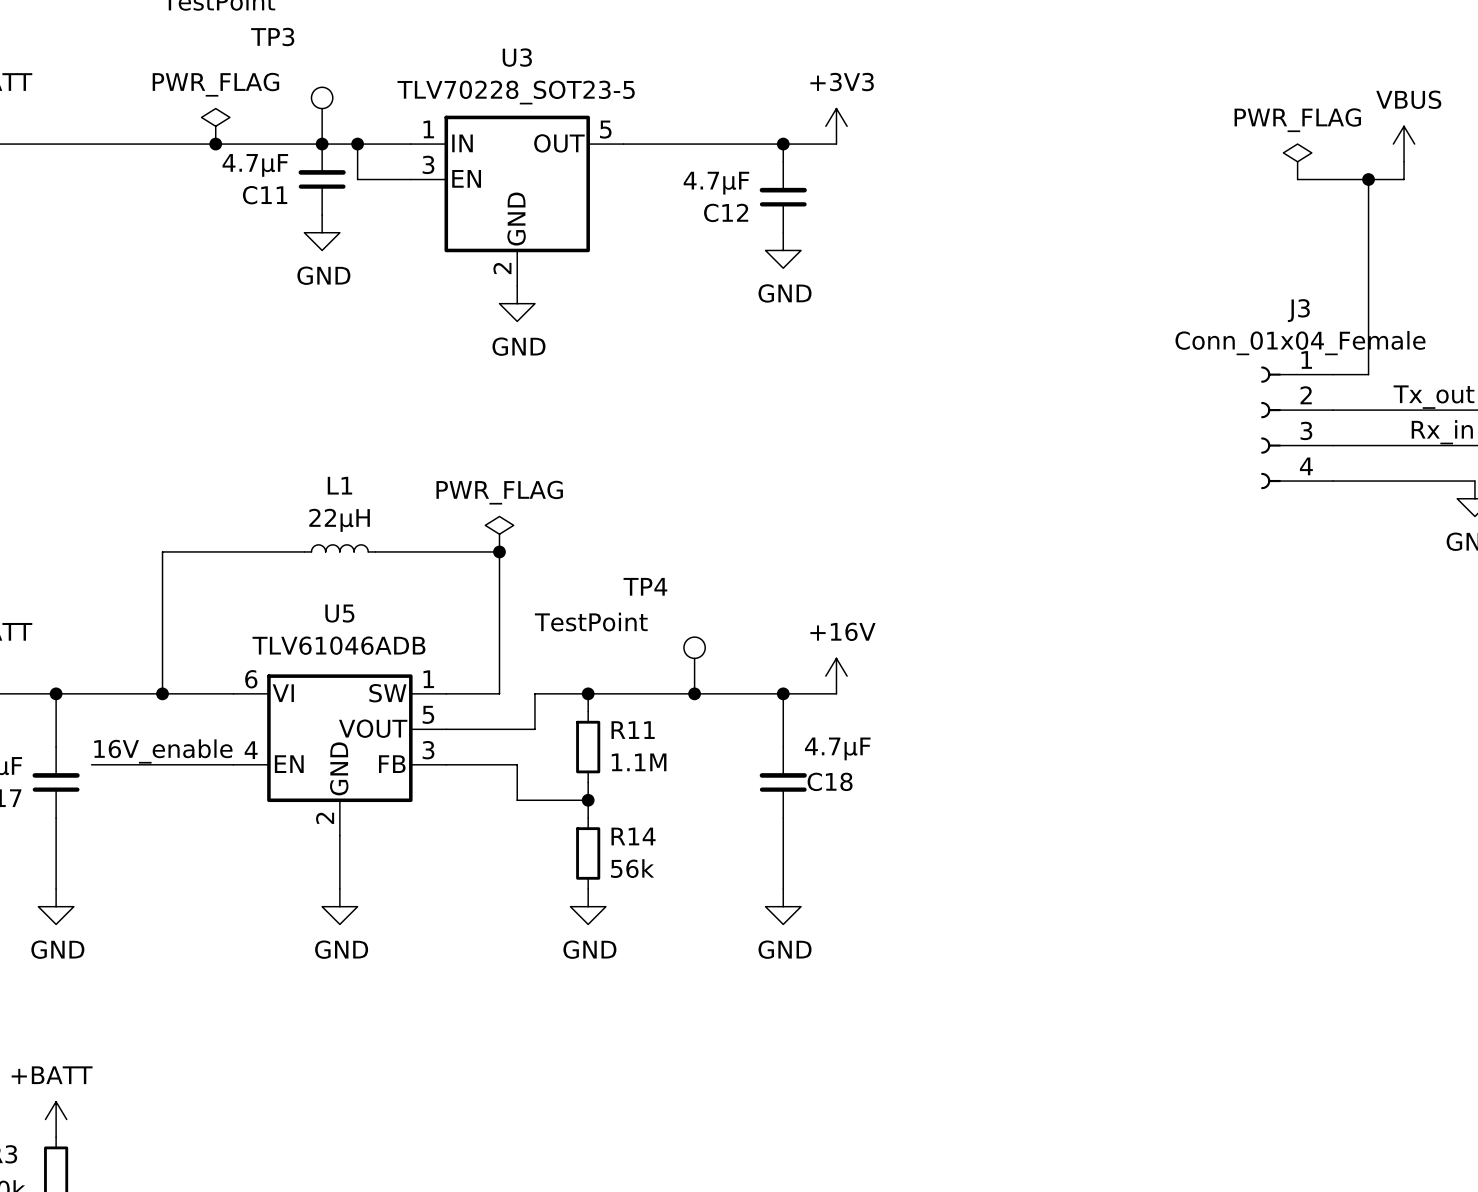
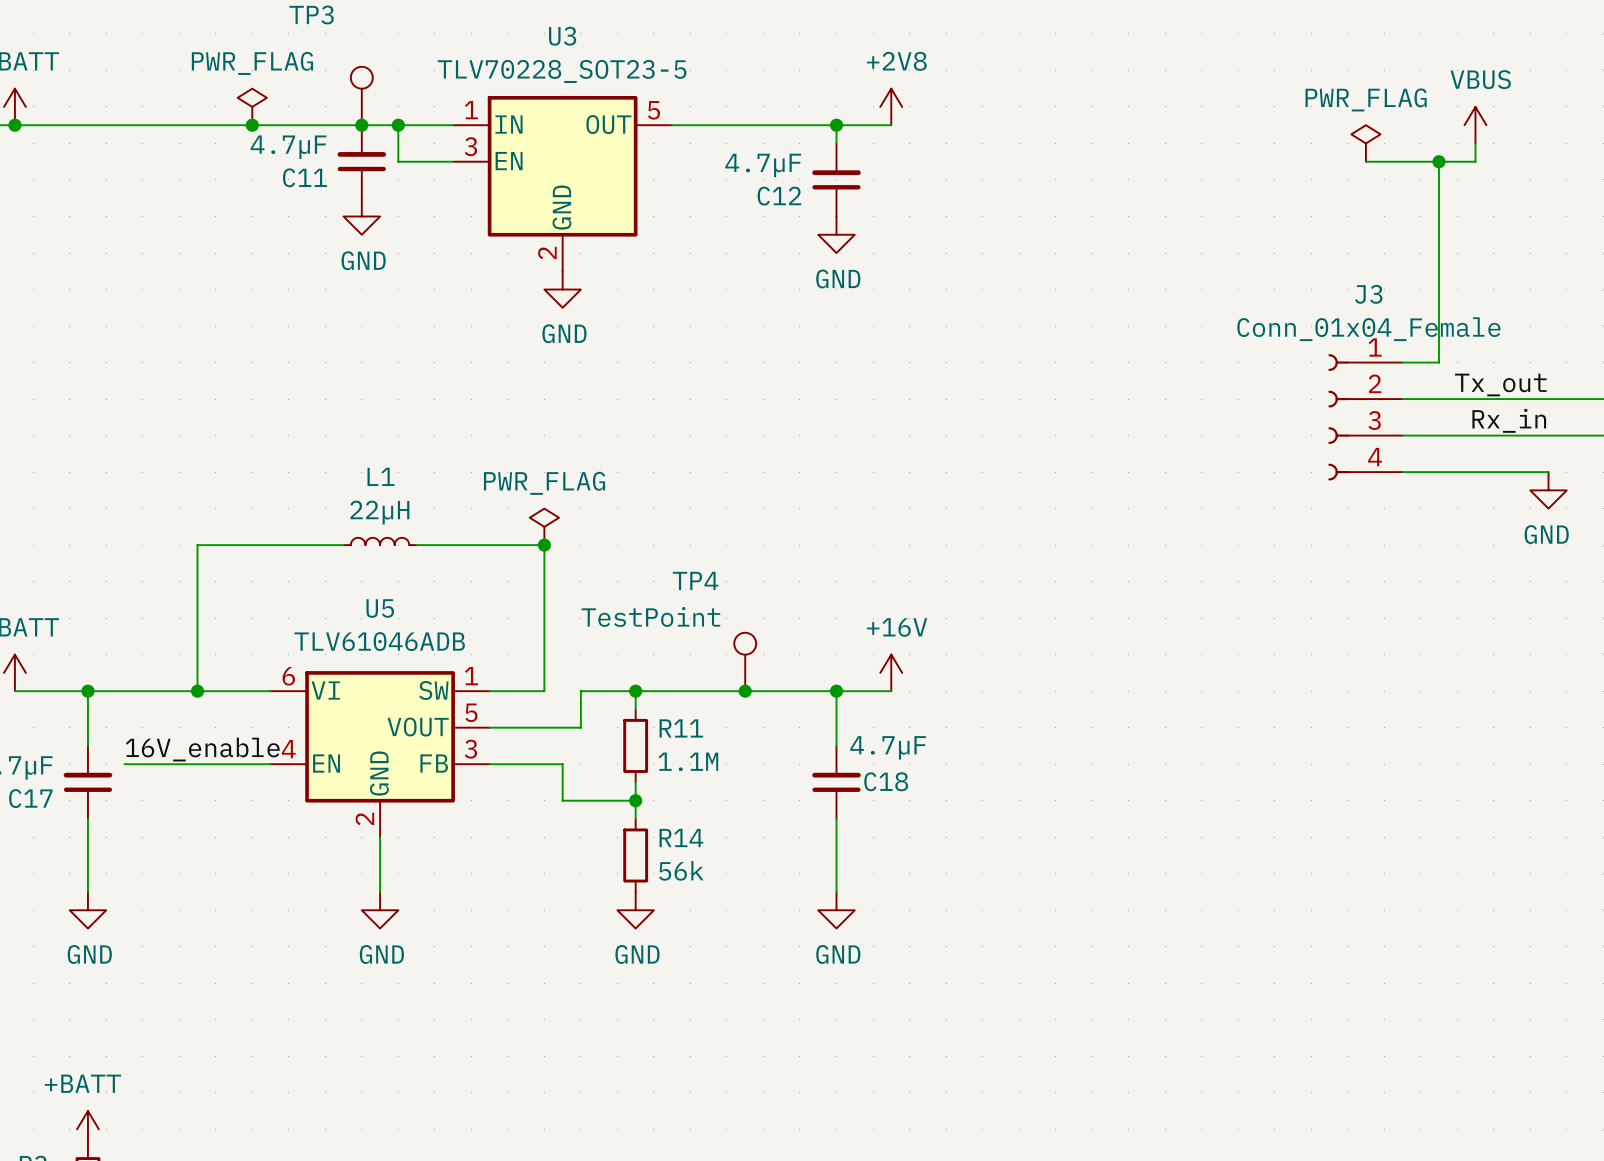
power symbol: +3V3 (836, 126) -> +2V8 (891, 106)

